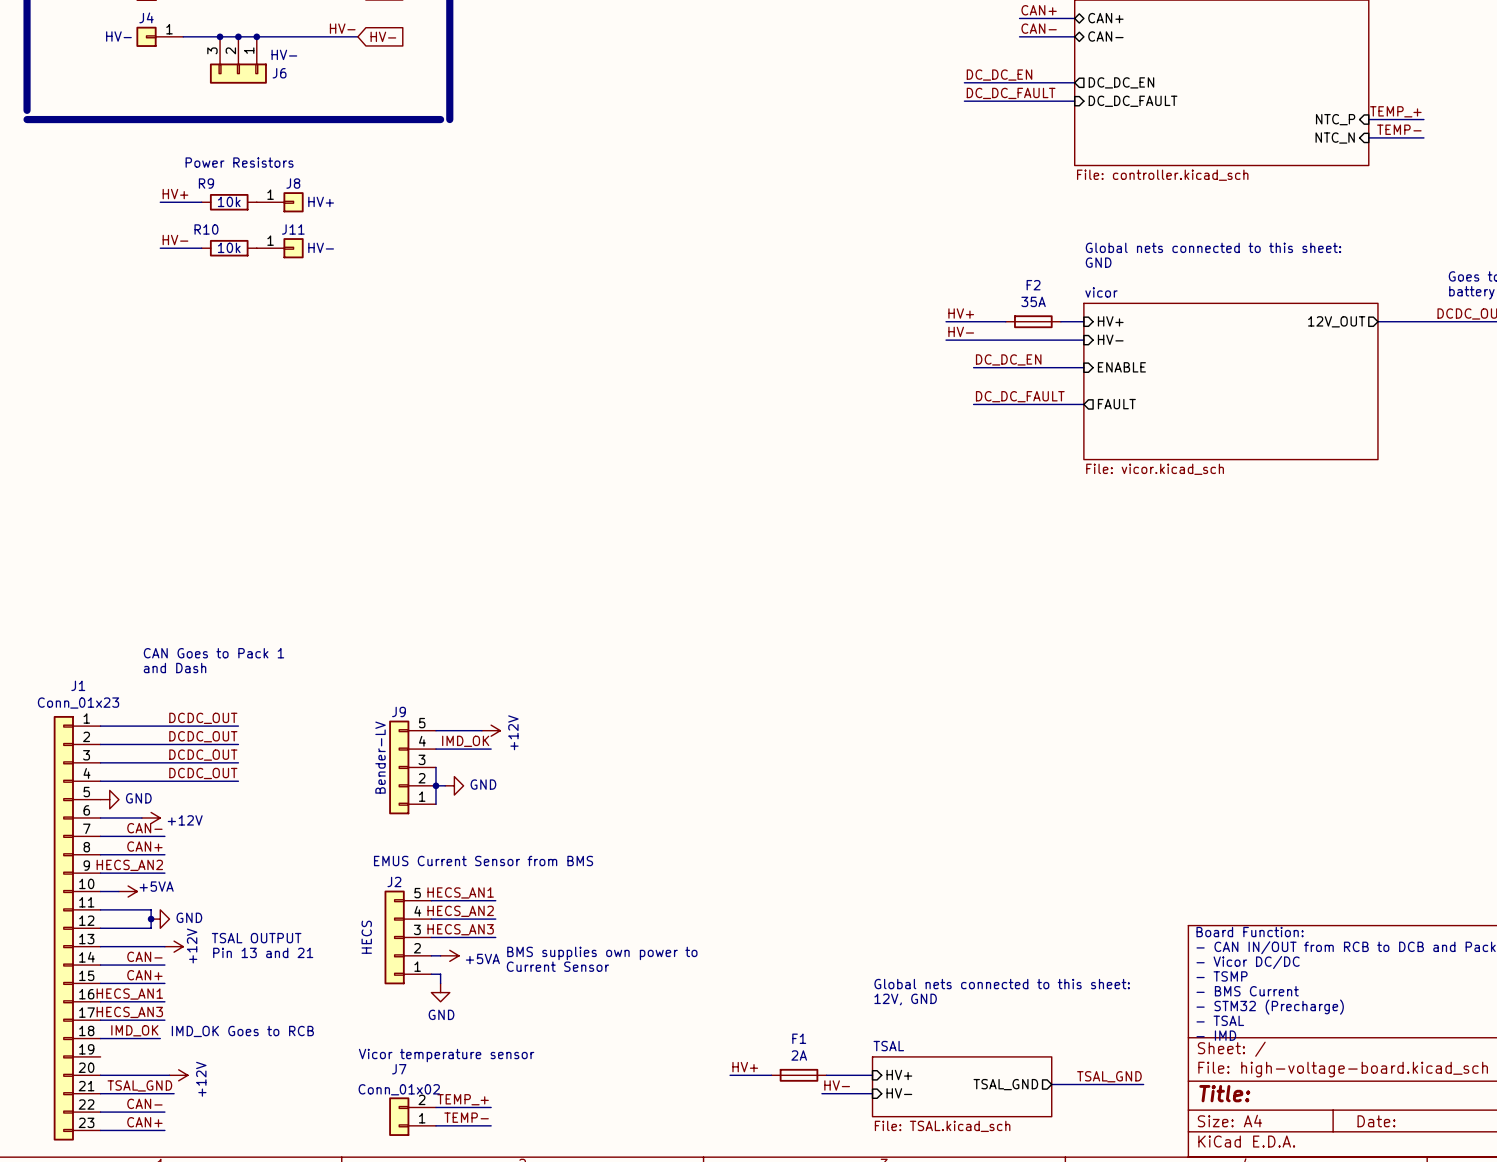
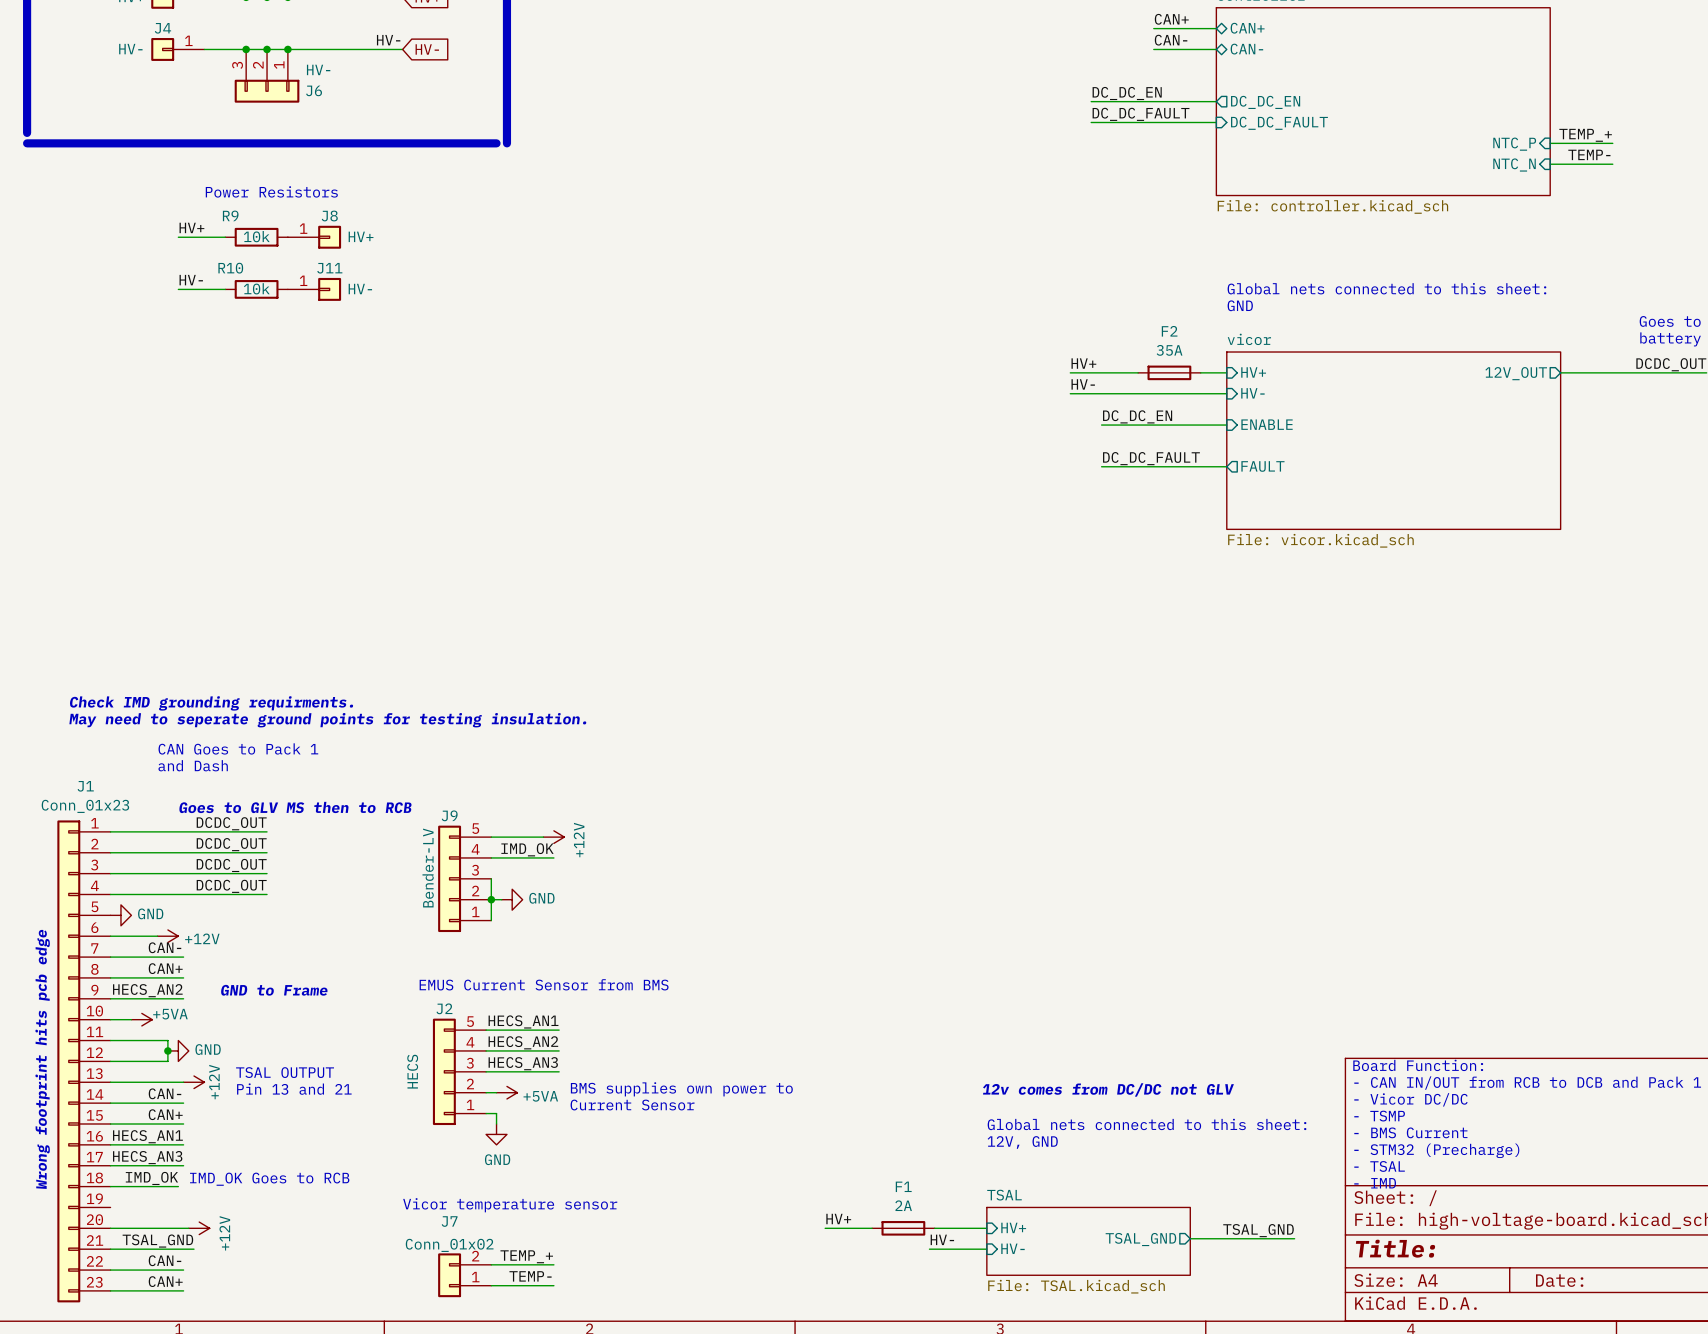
text: none -> Check IMD grounding requirments. (211, 703)
text: none -> May need to seperate ground points for testing insulation. (327, 720)
text: none -> Goes to GLV MS then to RCB (295, 807)
text: none -> GND to Frame (274, 990)
text: none -> Wrong footprint hits pcb edge (42, 1059)
text: none -> 12v comes from DC/DC not GLV (1108, 1089)

